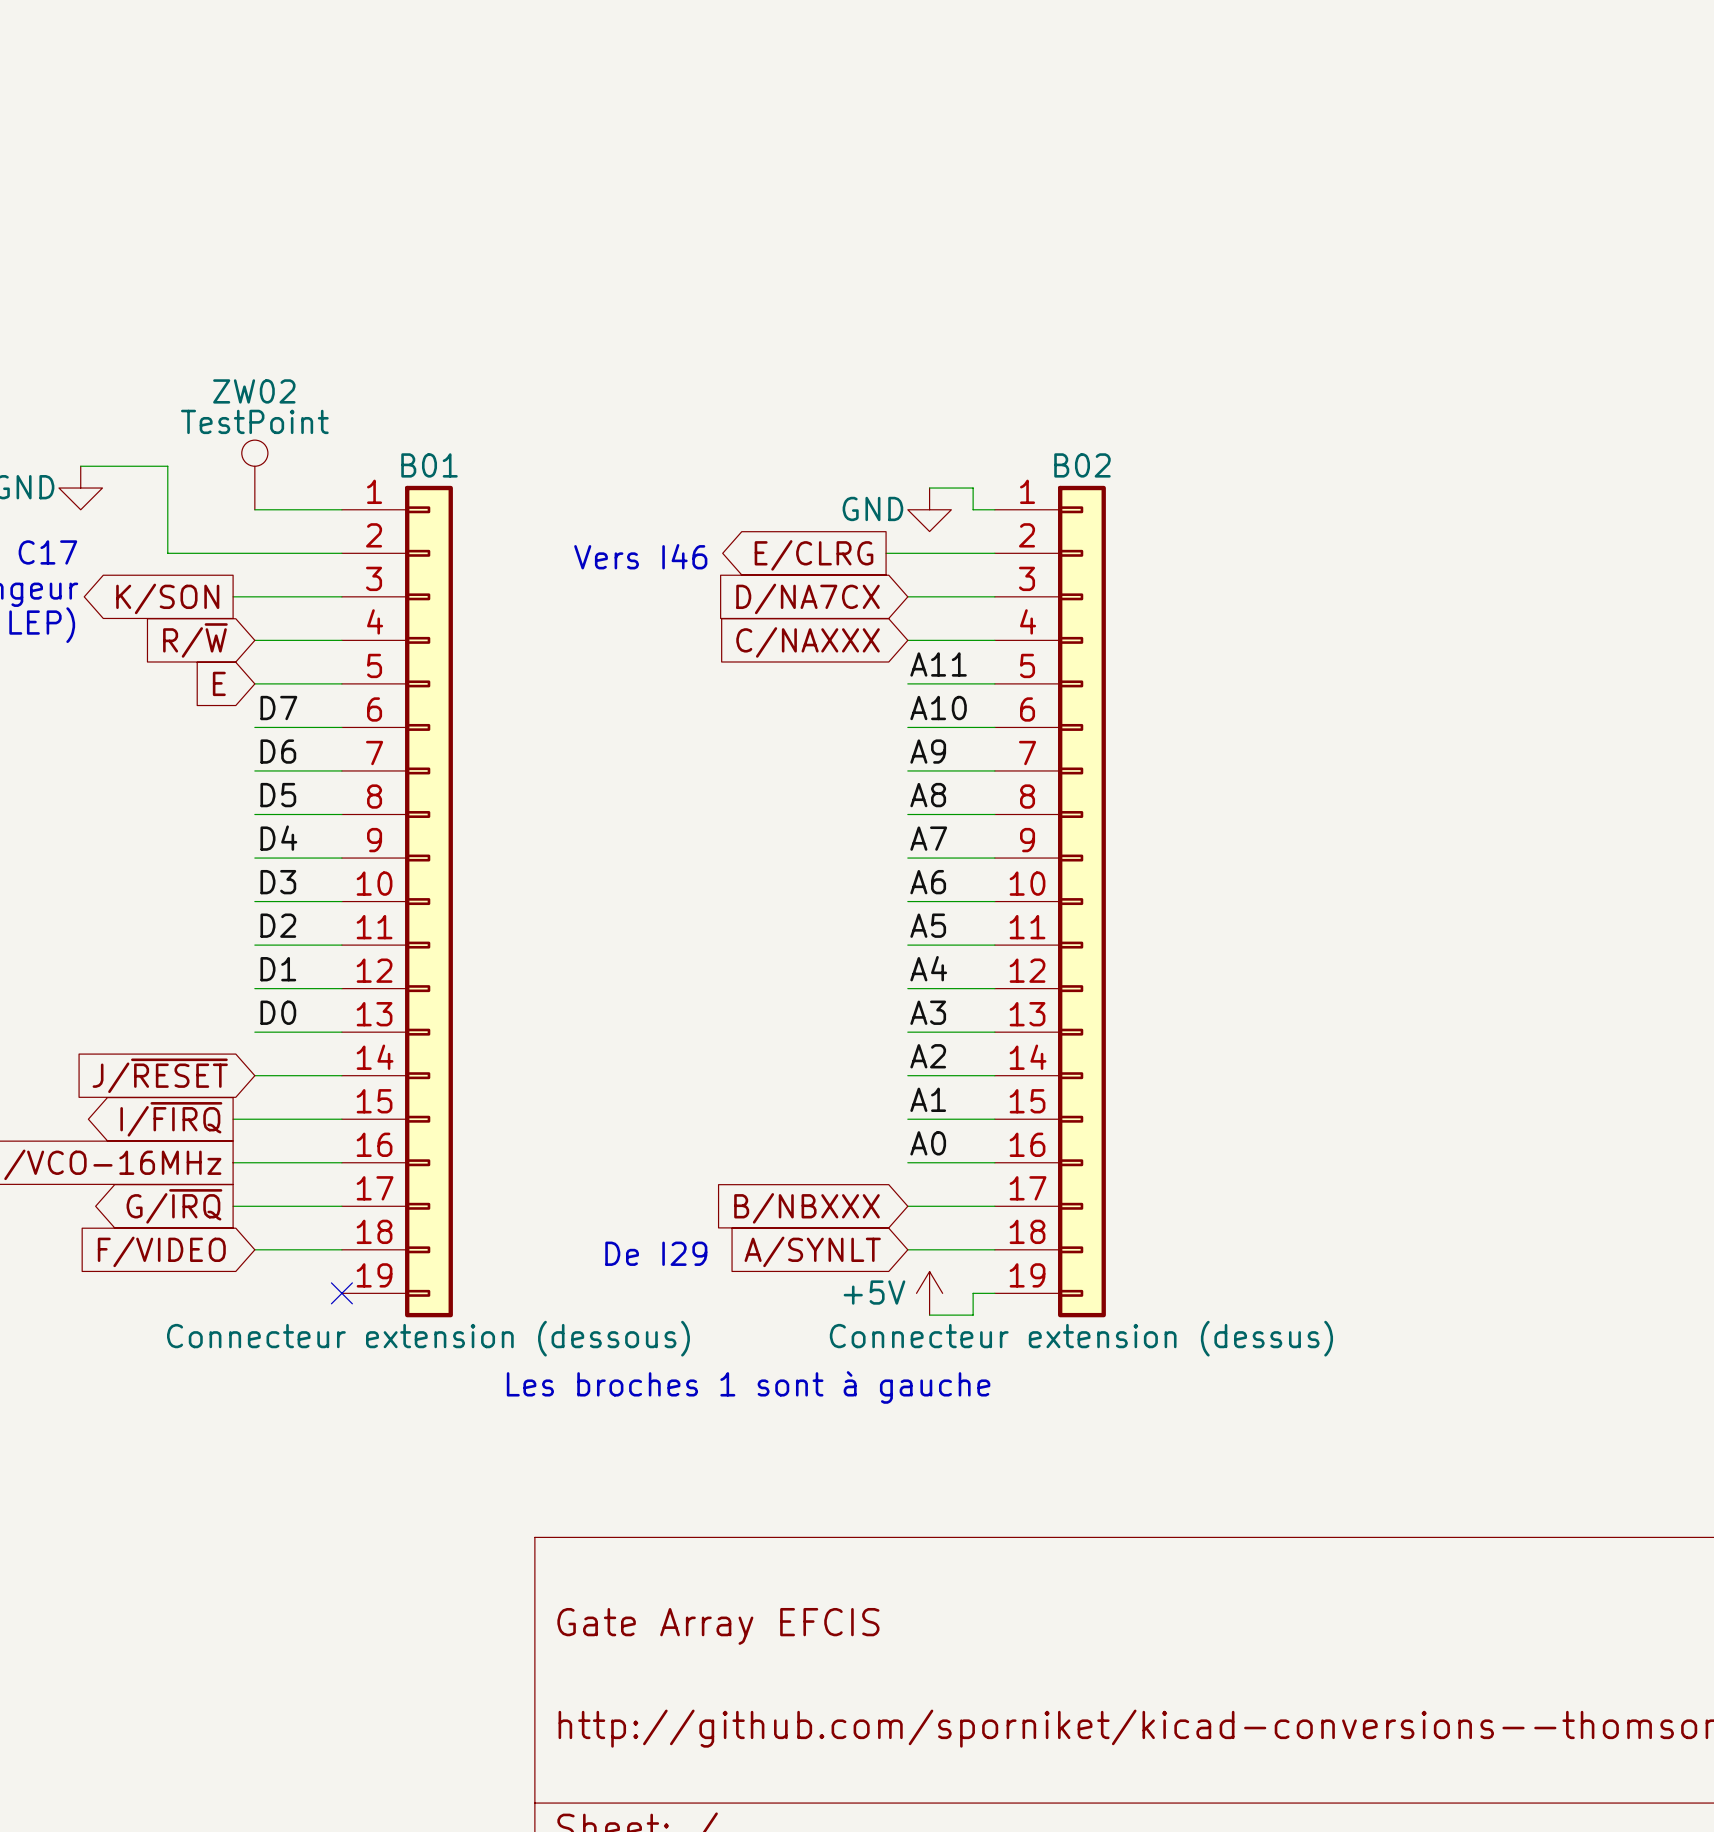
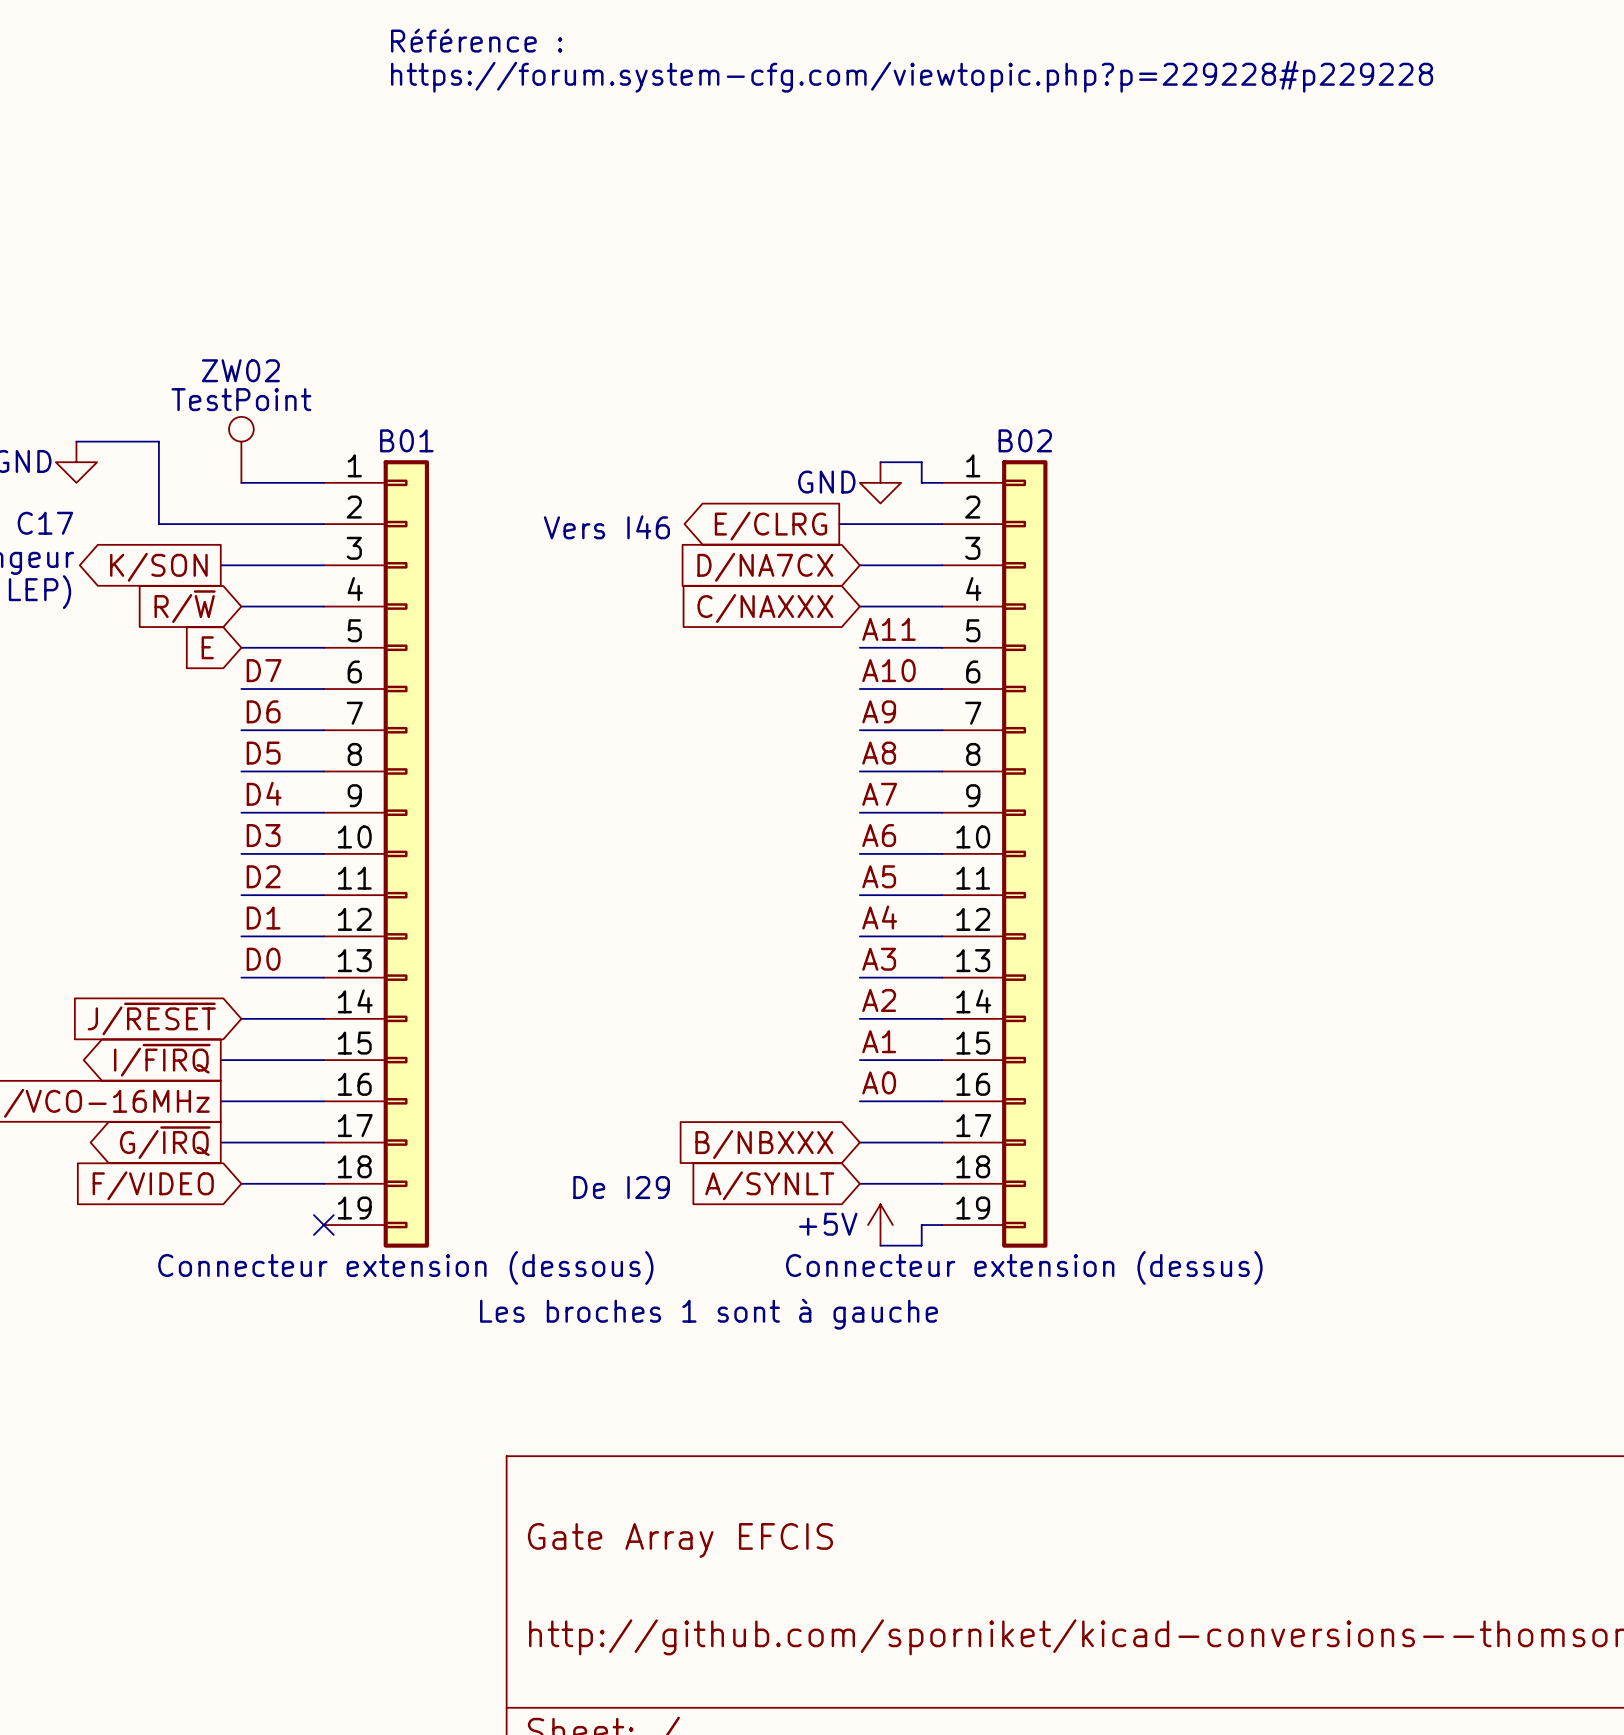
text: none -> Référence : (476, 40)
text: none -> https://forum.system-cfg.com/viewtopic.php?p=229228#p229228 (912, 76)

